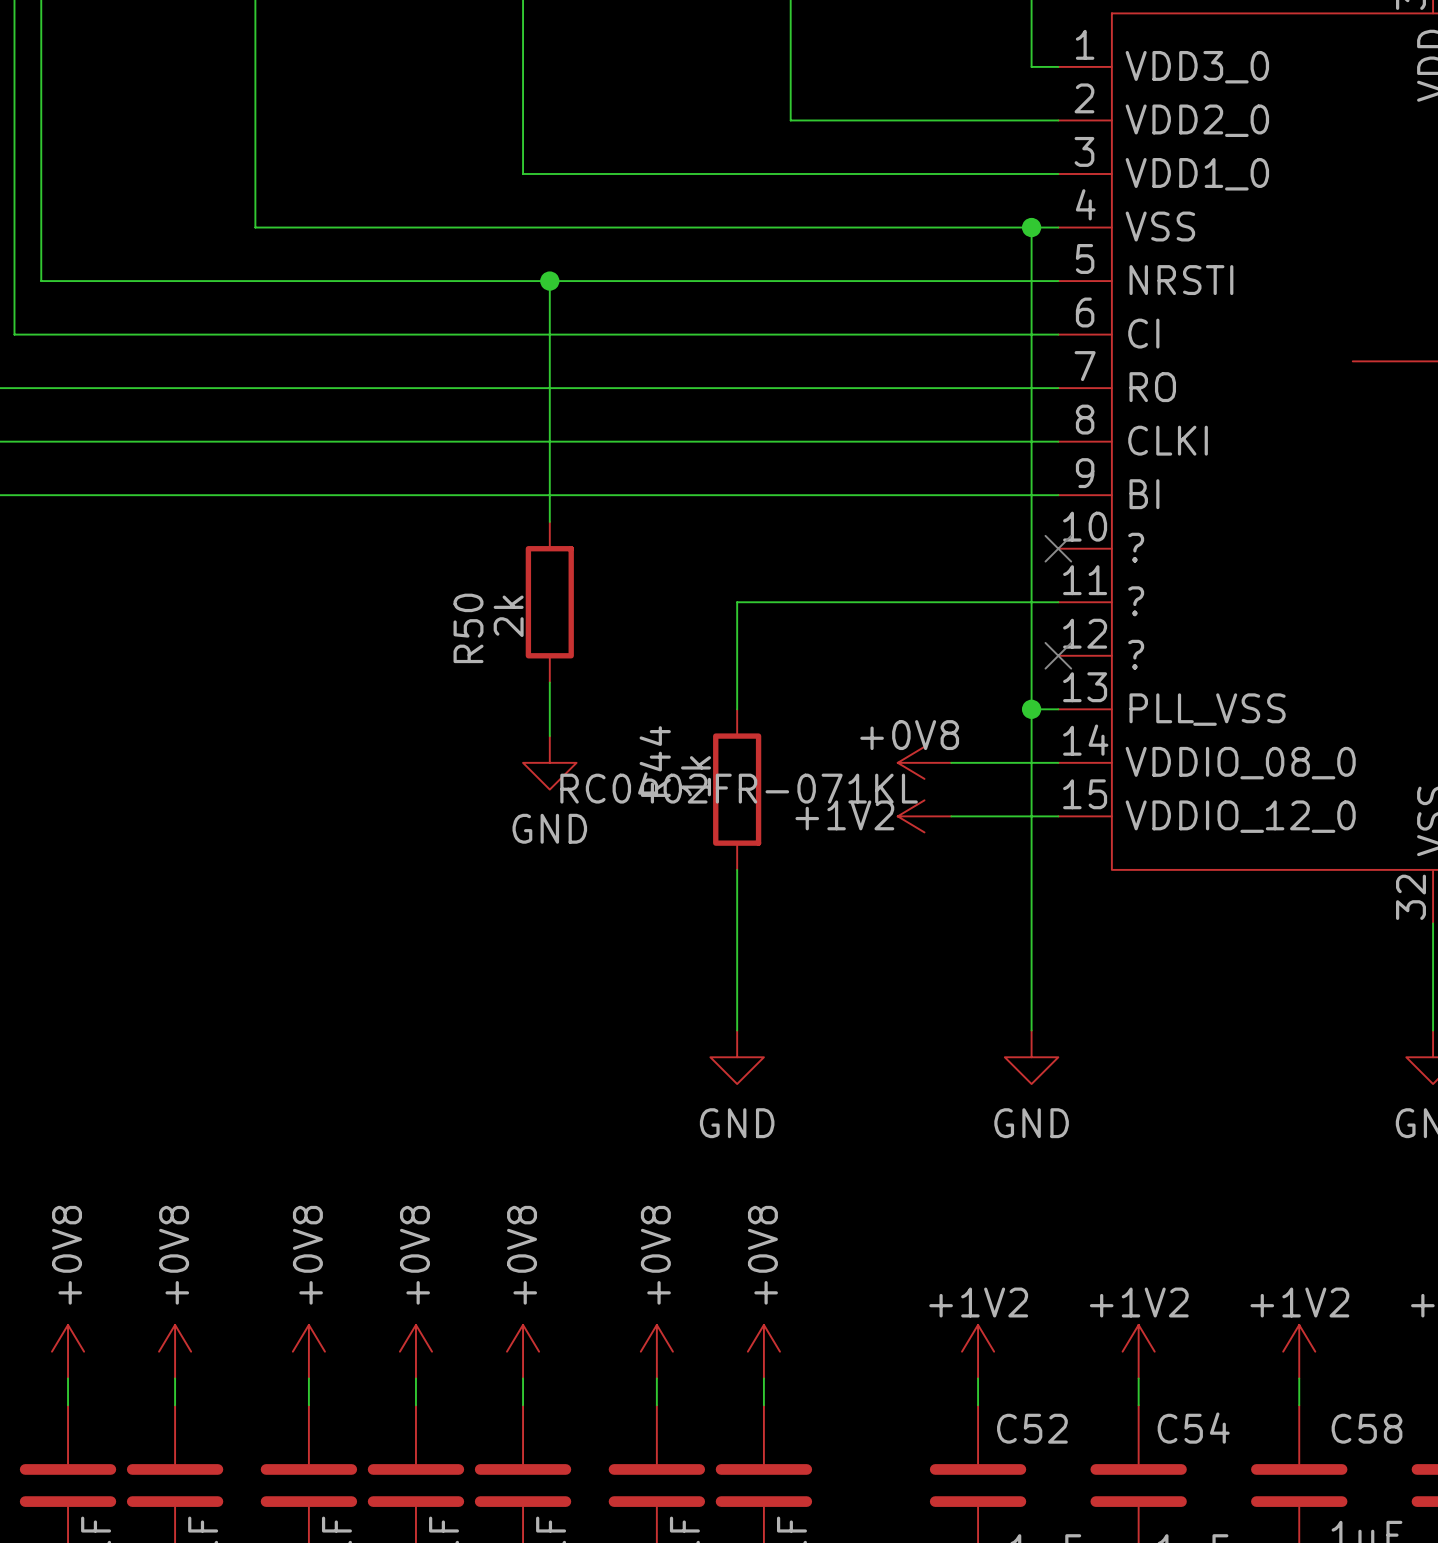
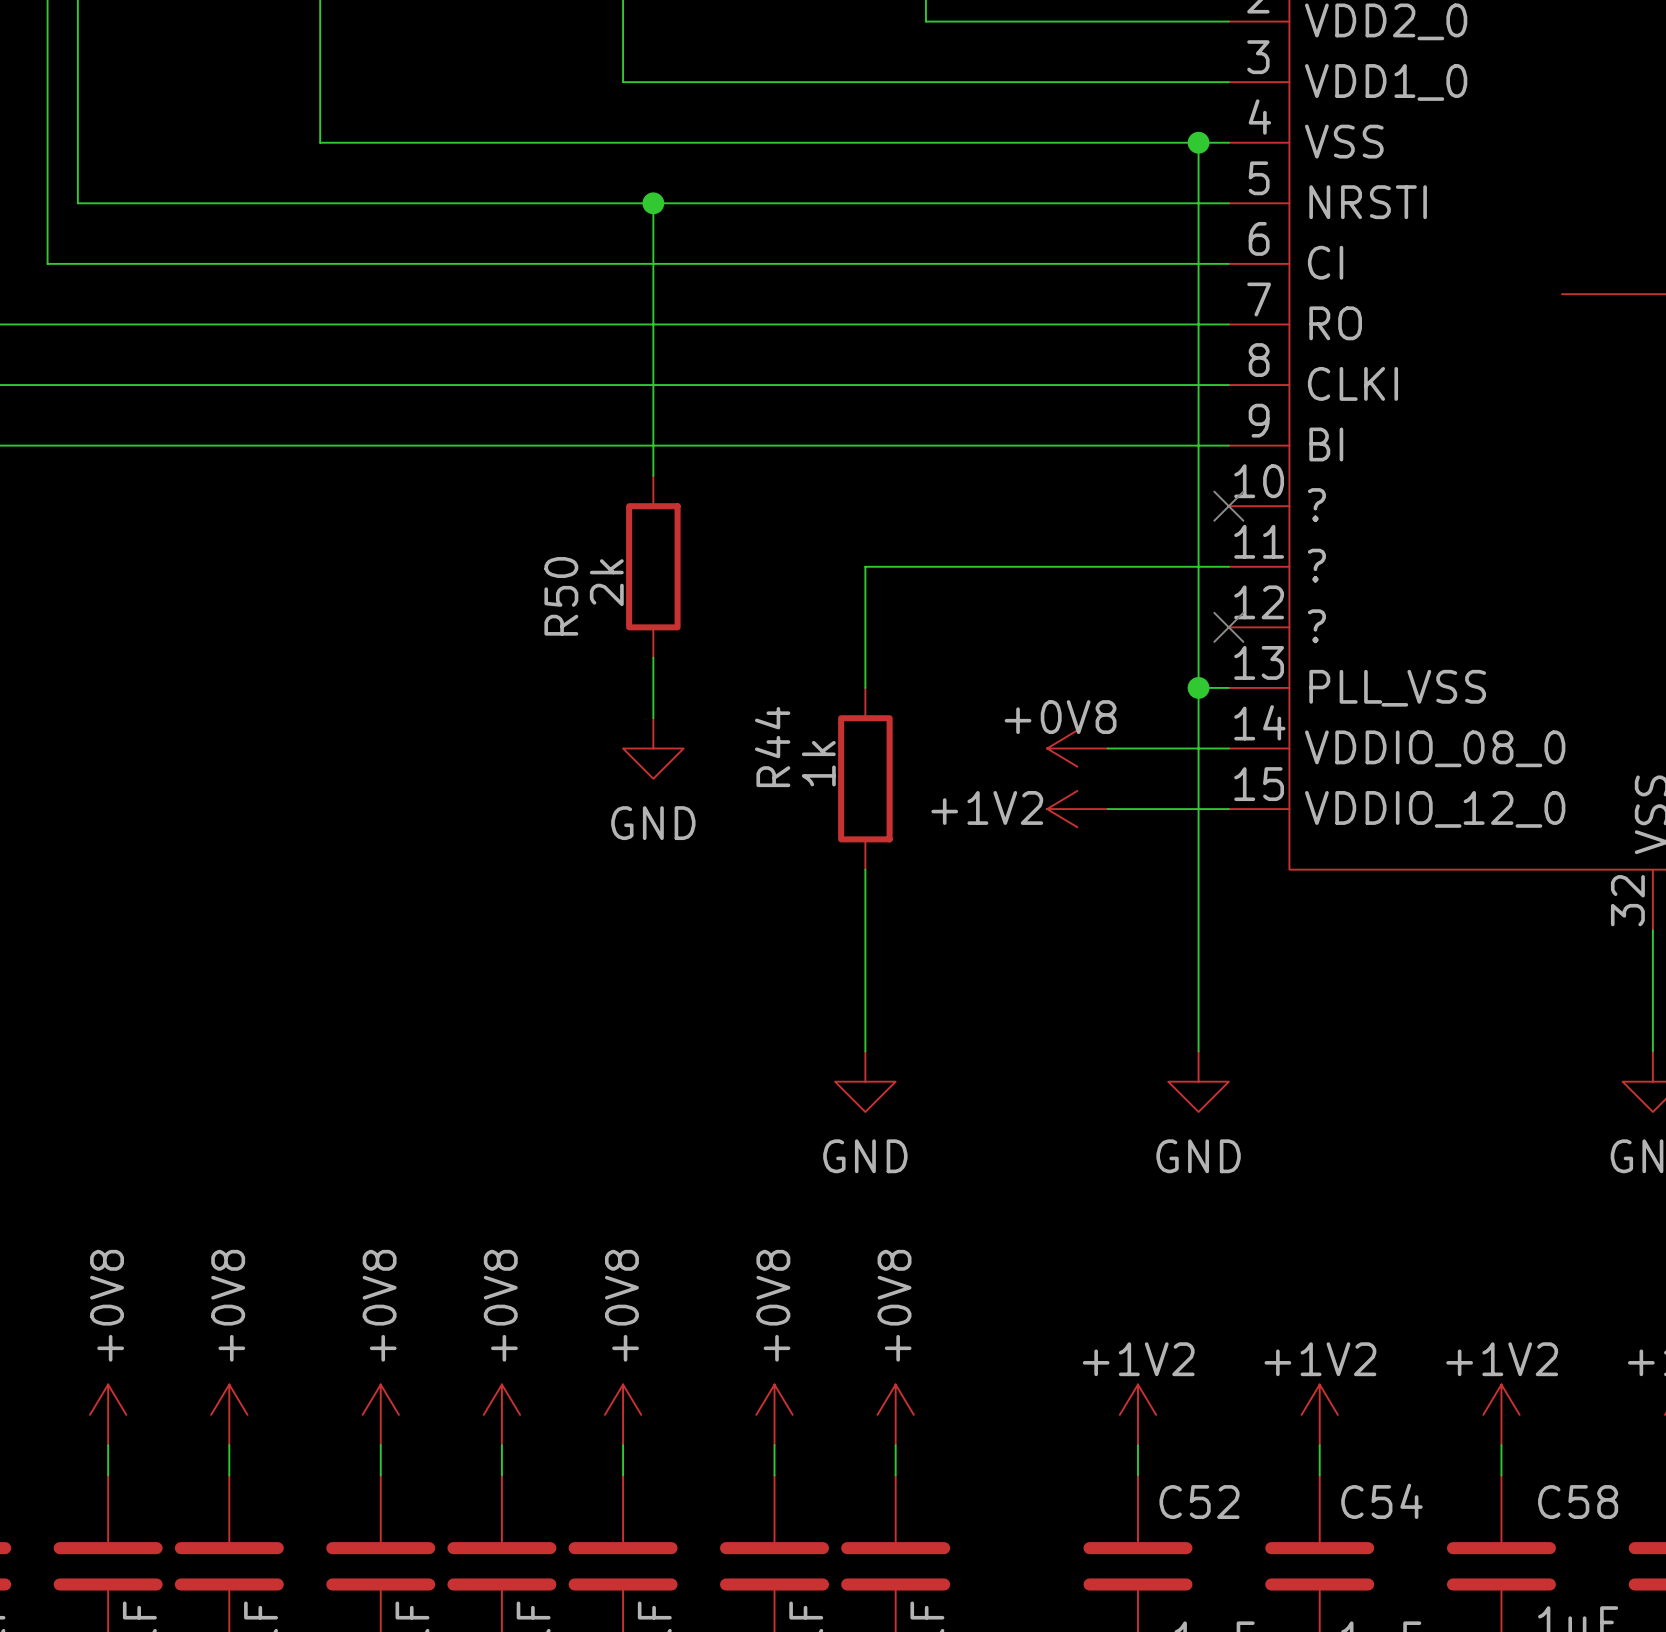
R44 text: RC0402FR-071KL (739, 787) -> none

